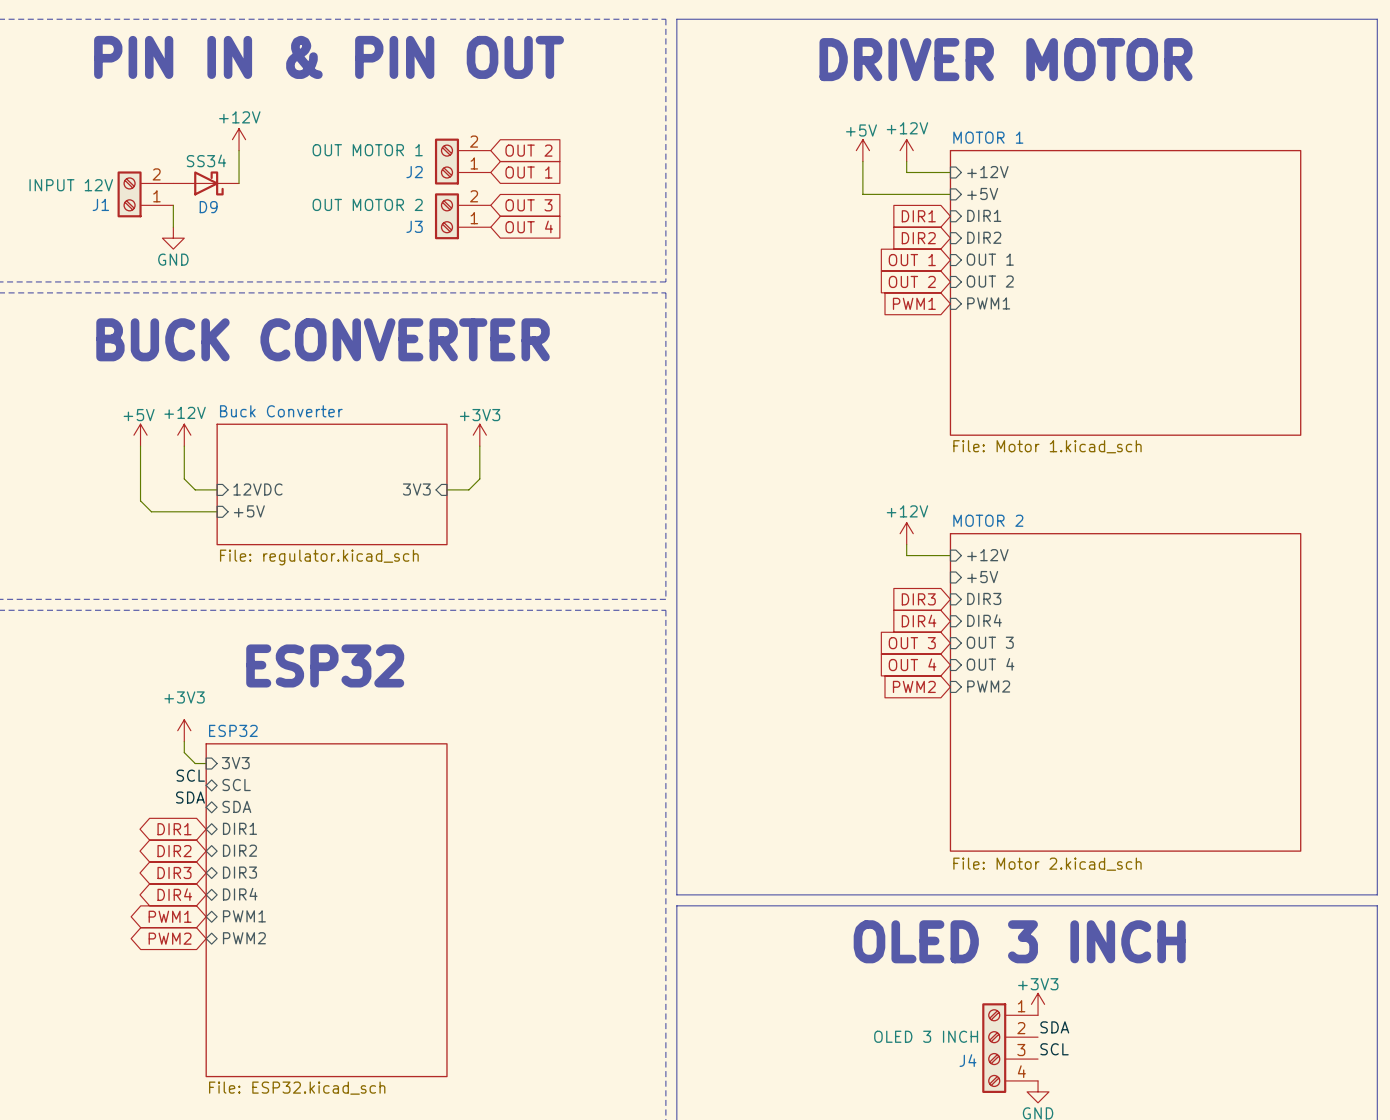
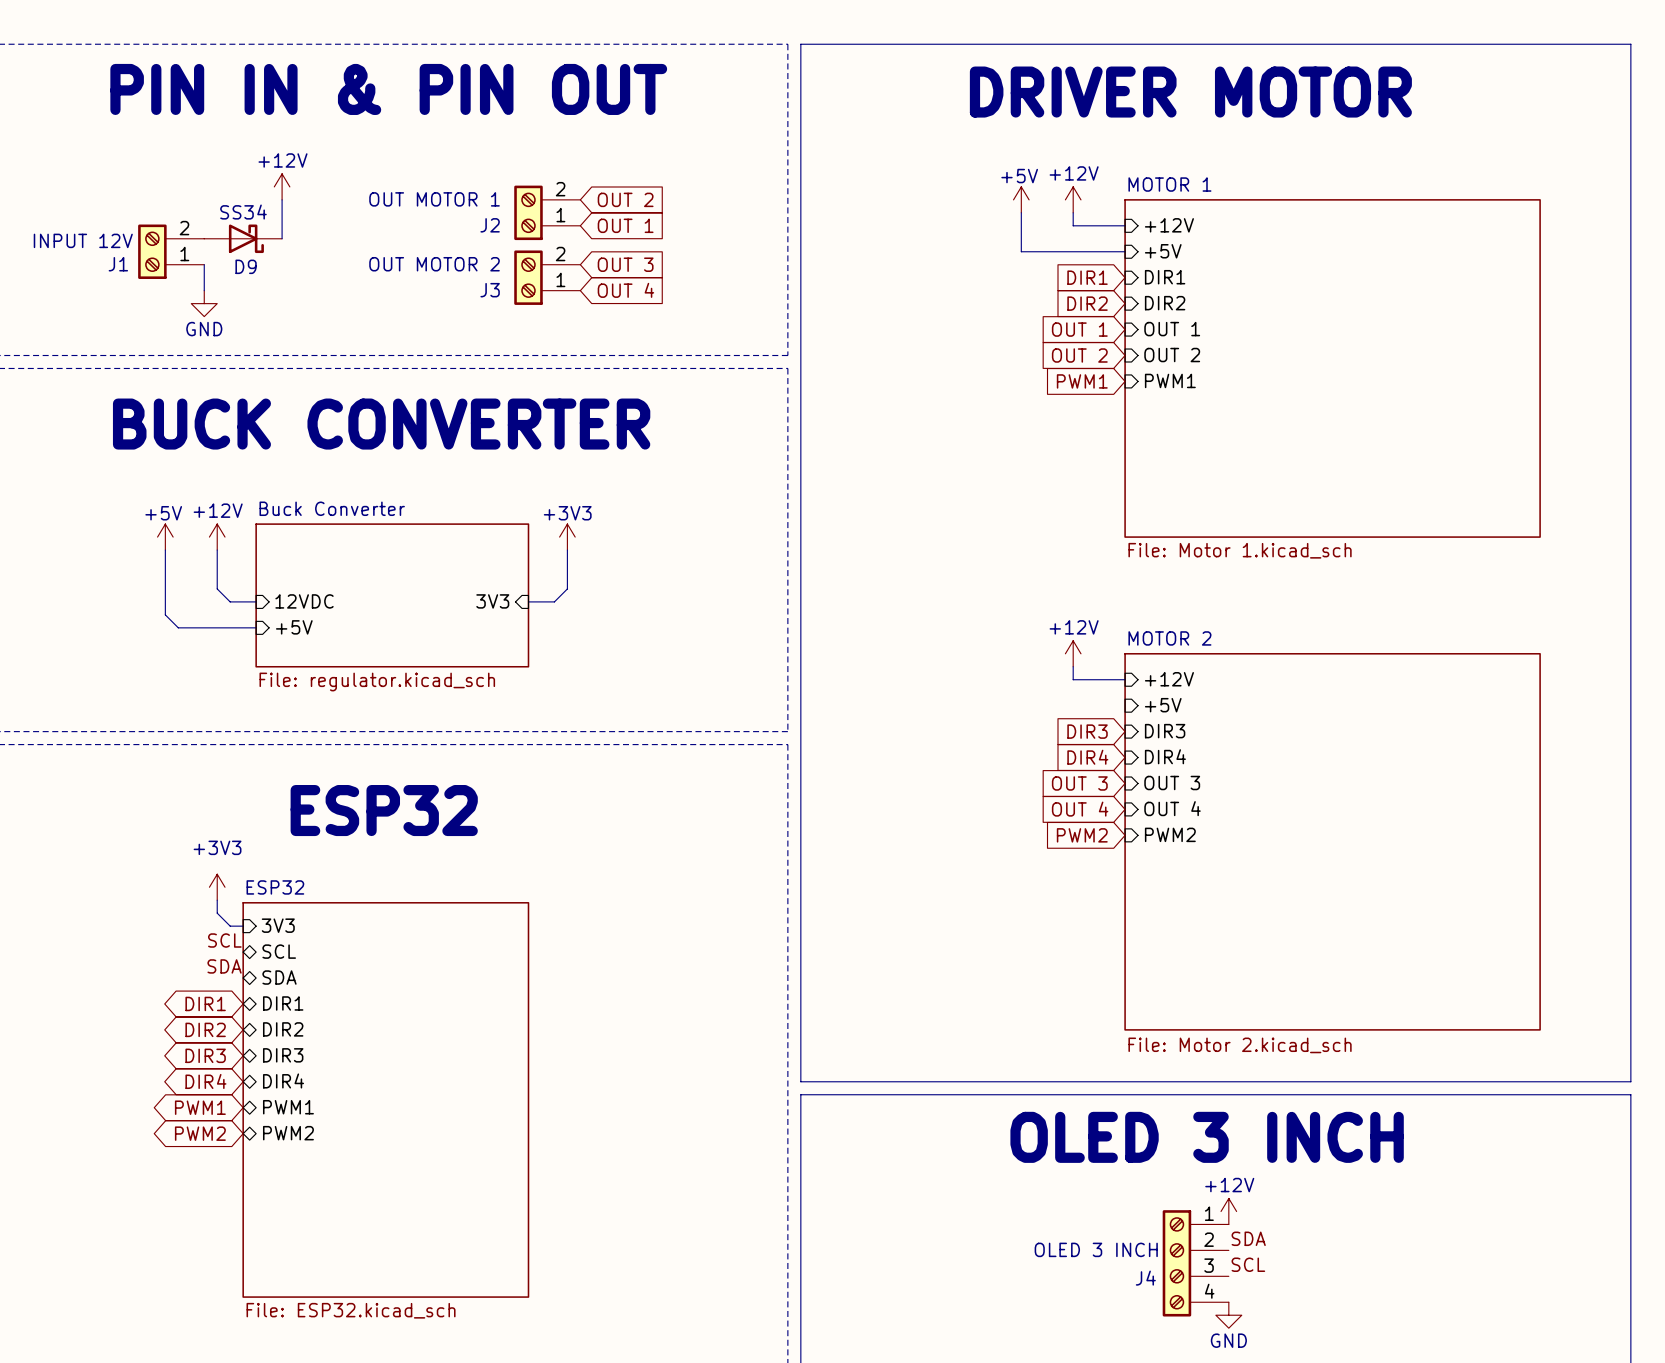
power symbol: +3V3 (1038, 1004) -> +12V (1228, 1211)

